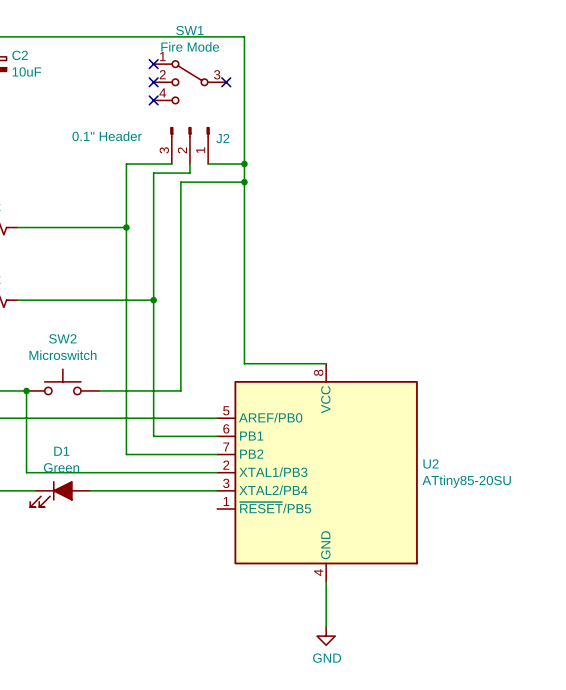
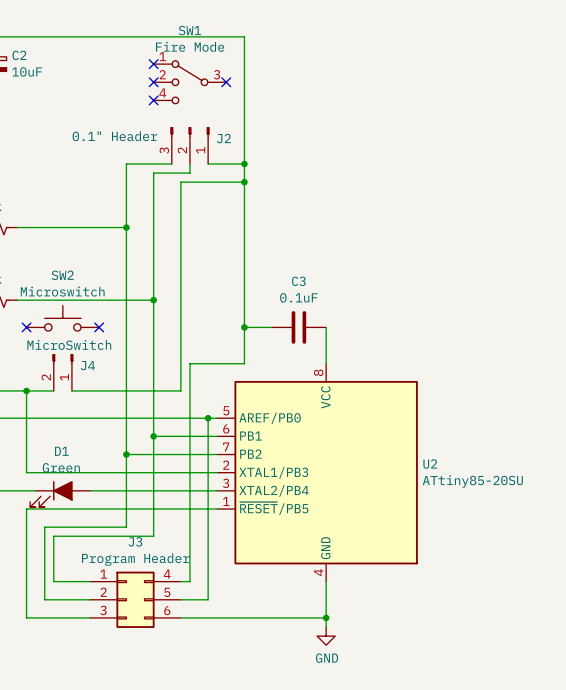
no-connect mark: none -> (26, 327)
no-connect mark: none -> (99, 327)
wire: none -> (244, 327) (271, 327)
junction: none -> (244, 327)
C3: none -> 0.1uF (298, 327)
wire: (244, 363) (326, 363) -> (326, 327) (326, 363)
wire: none -> (244, 363) (189, 363) (189, 581) (180, 581)
J4: none -> MicroSwitch (62, 372)
SW2 position: (62, 381) -> (62, 318)
wire: none -> (208, 418) (208, 599) (180, 599)
junction: none -> (208, 418)
wire: none -> (153, 436) (153, 536) (53, 536) (53, 581) (90, 581)
junction: none -> (153, 436)
wire: none -> (126, 454) (126, 527) (44, 527) (44, 599) (90, 599)
junction: none -> (126, 454)
wire: none -> (217, 509) (26, 509) (26, 617) (90, 617)
J3: none -> Program Header (135, 599)
wire: none -> (180, 617) (326, 617)
junction: none -> (326, 617)

